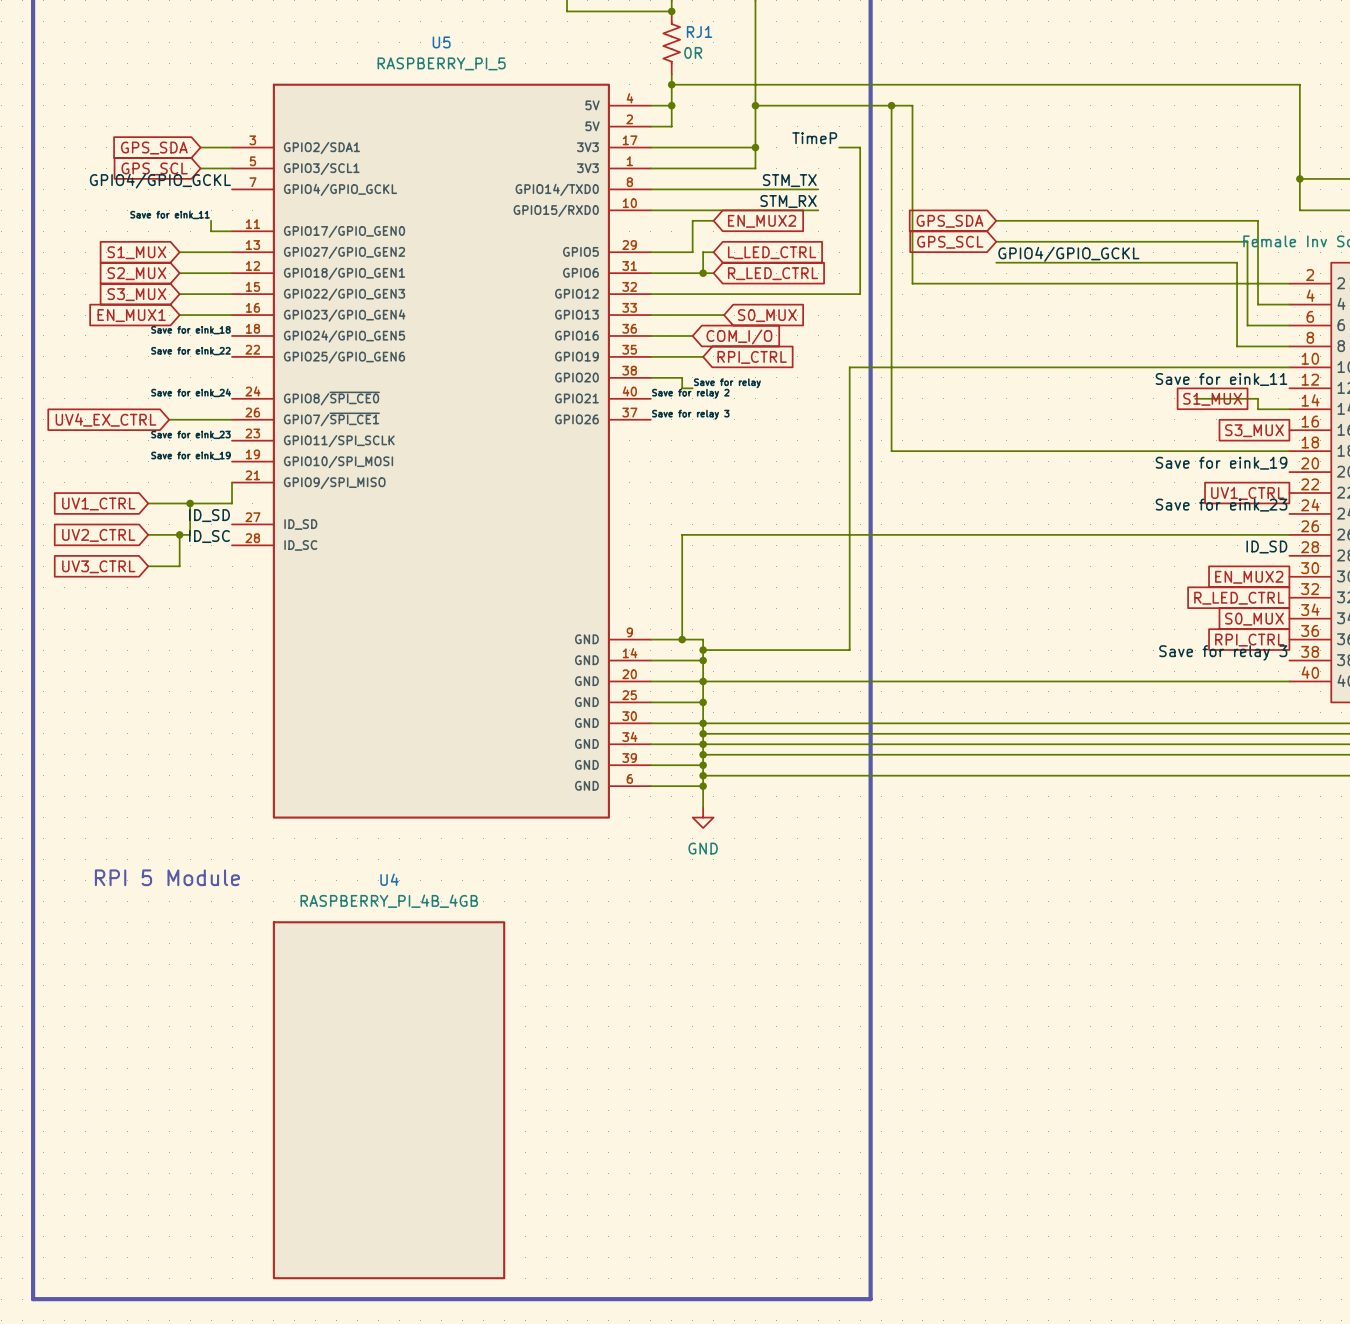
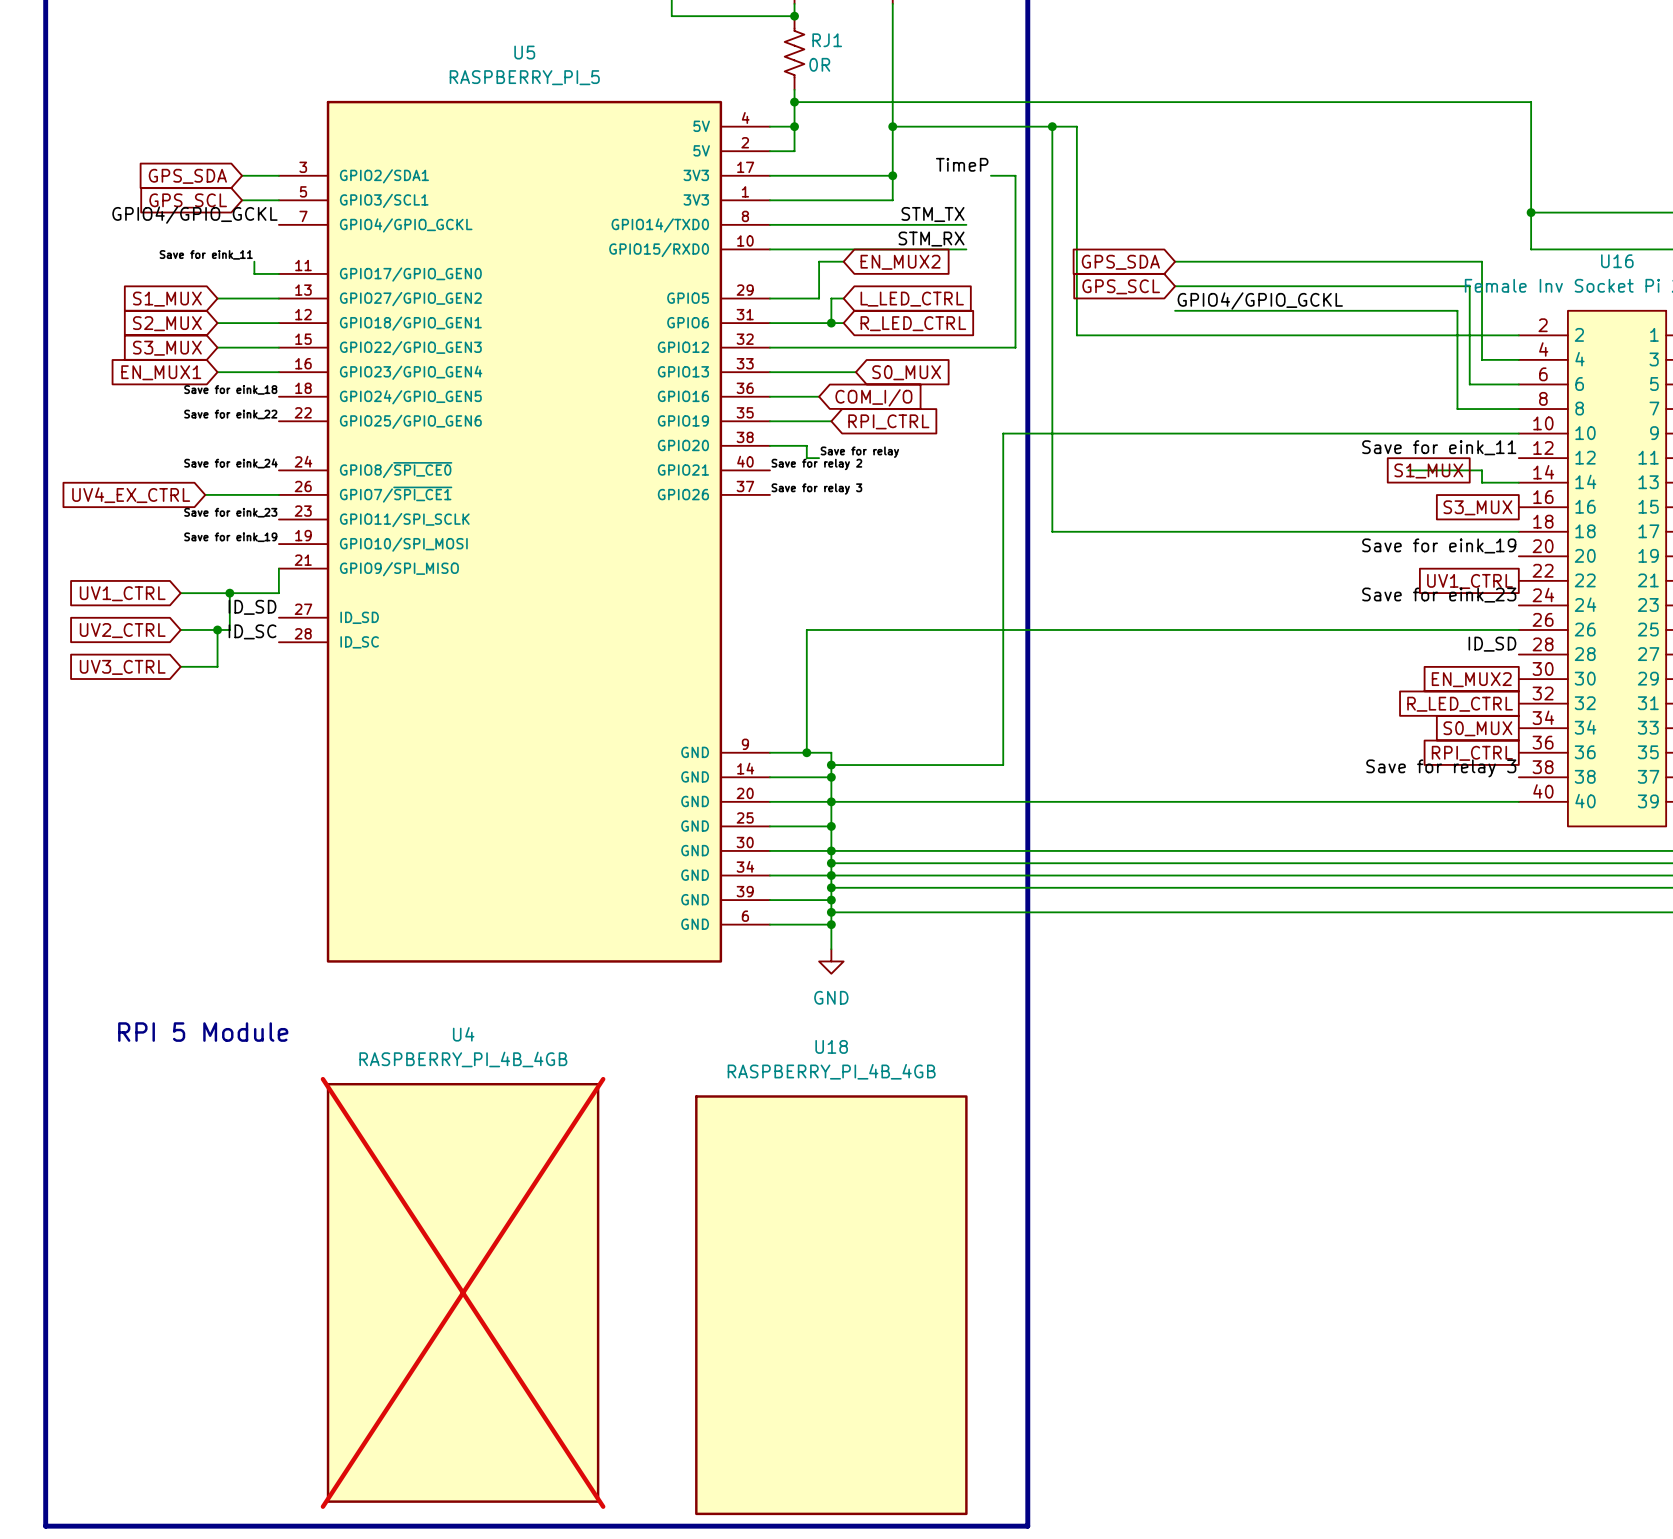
U4 do-not-place cross: none -> (463, 1292)
U18: none -> RASPBERRY_PI_4B_4GB (831, 1305)

